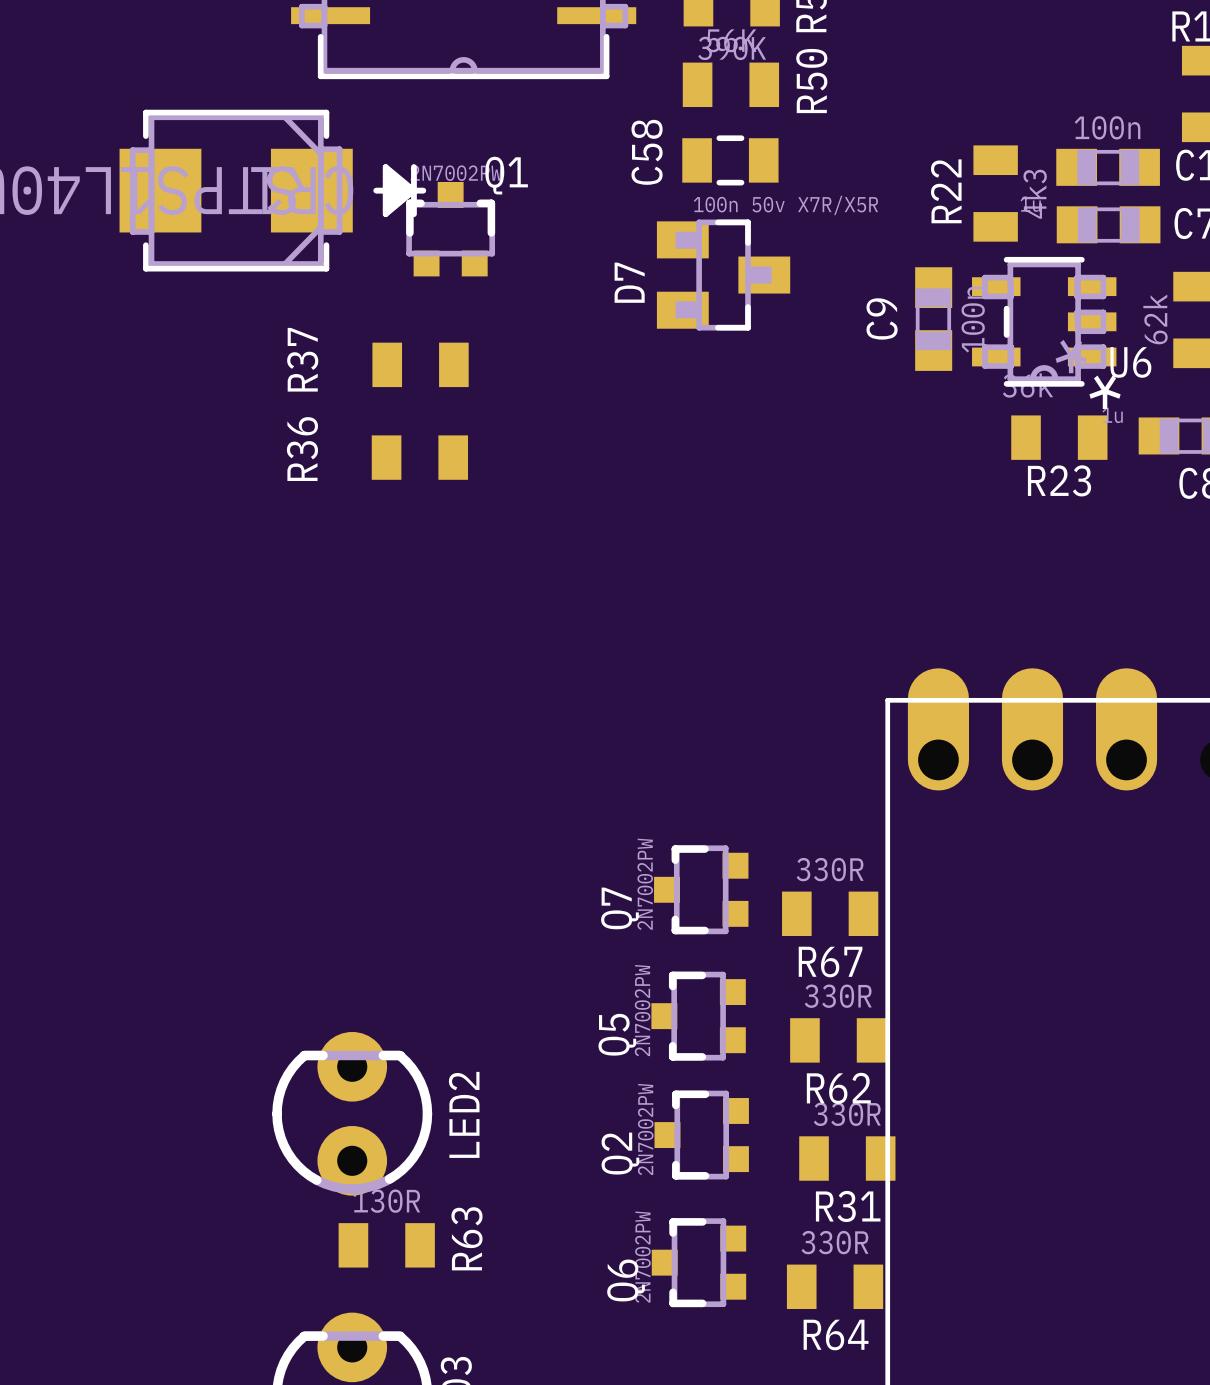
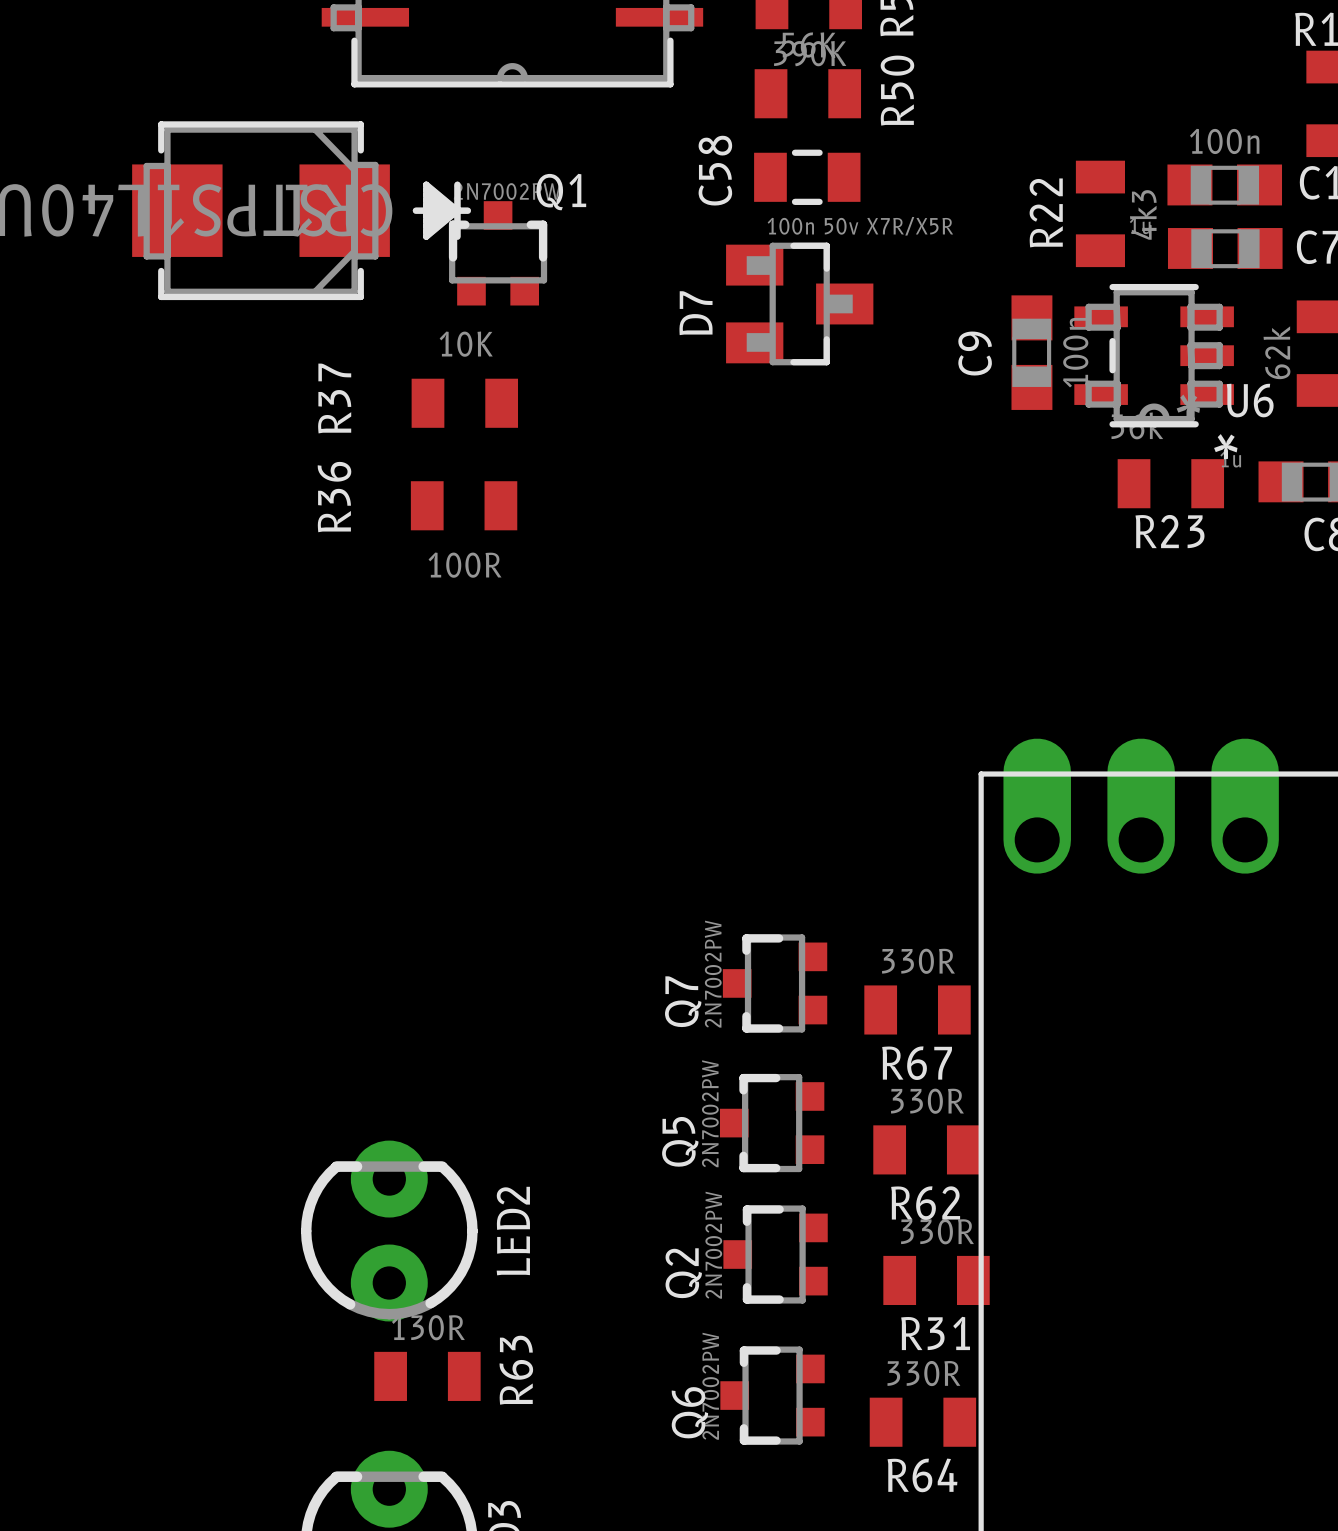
R37 value: none -> 10K (466, 344)
R36 value: none -> 100R (465, 565)

